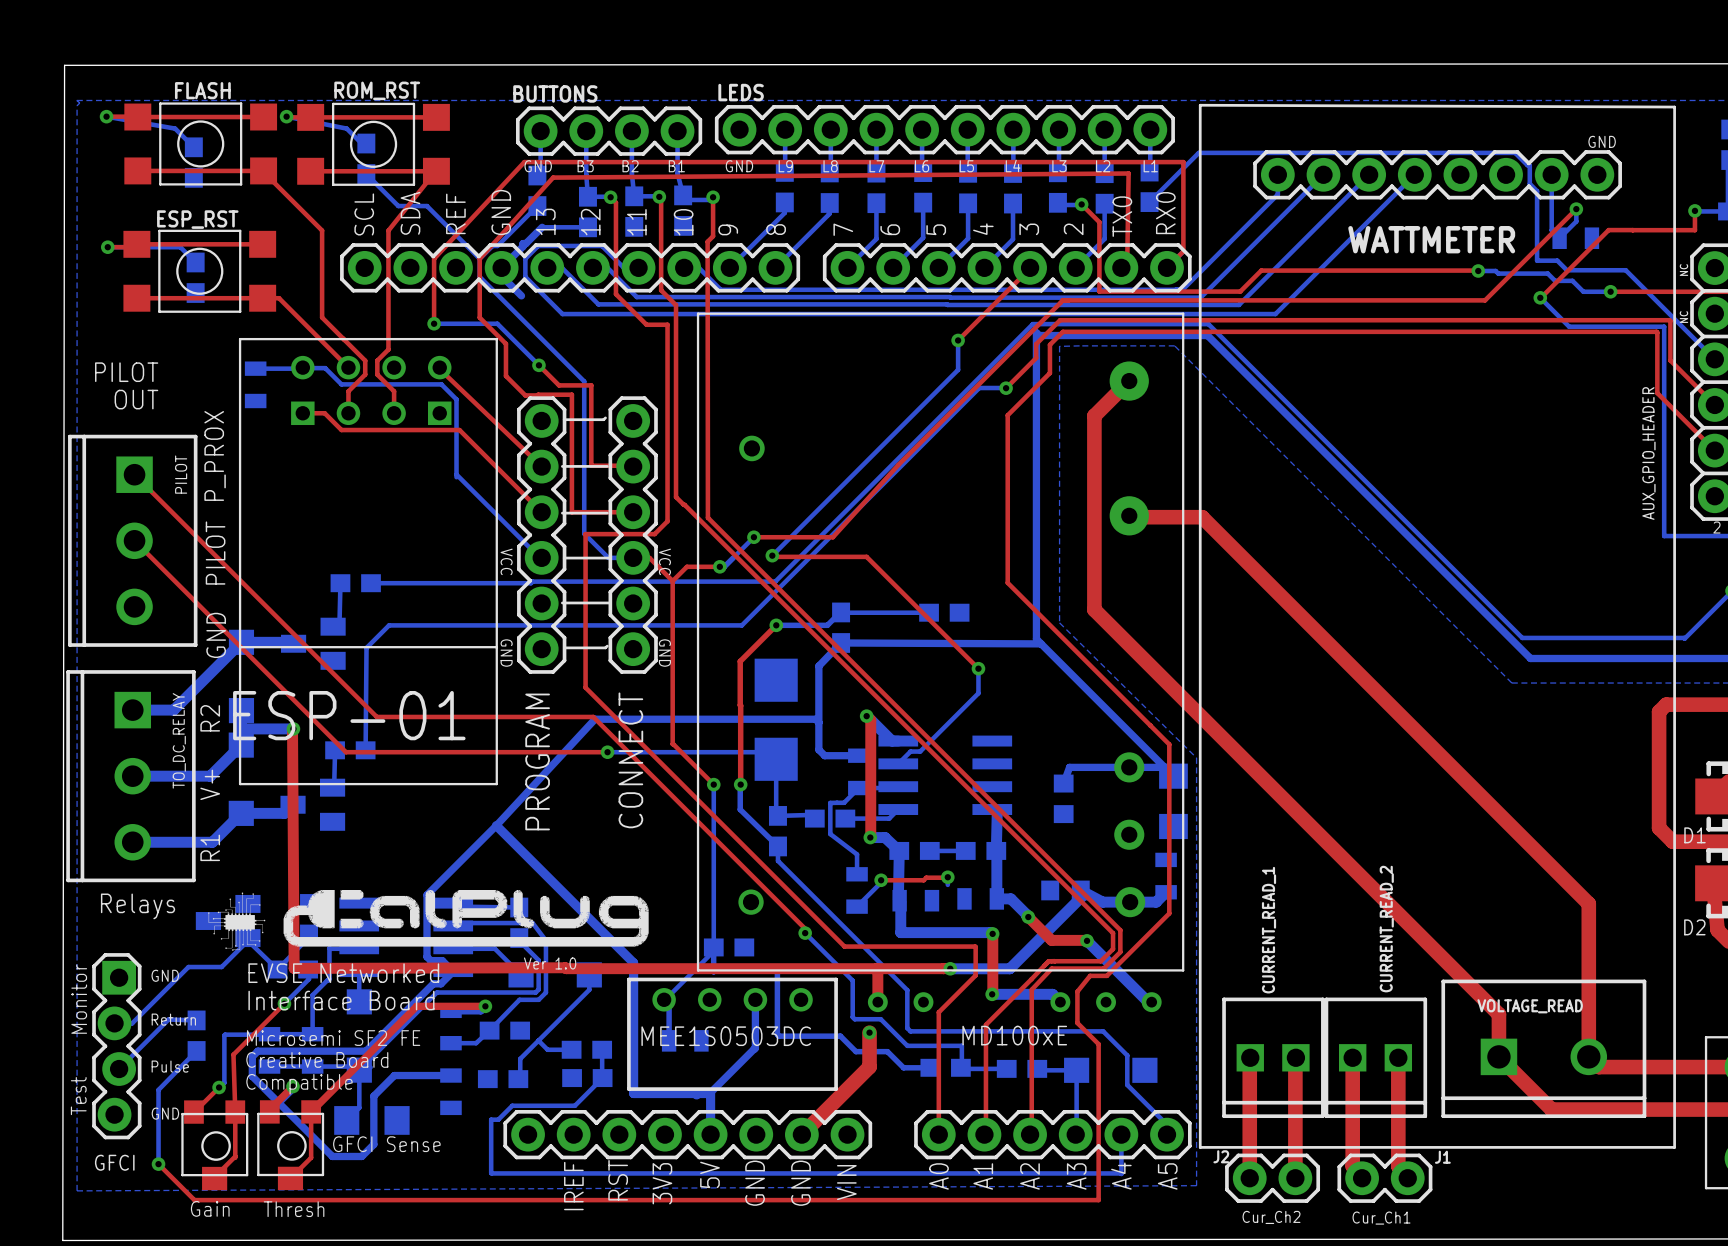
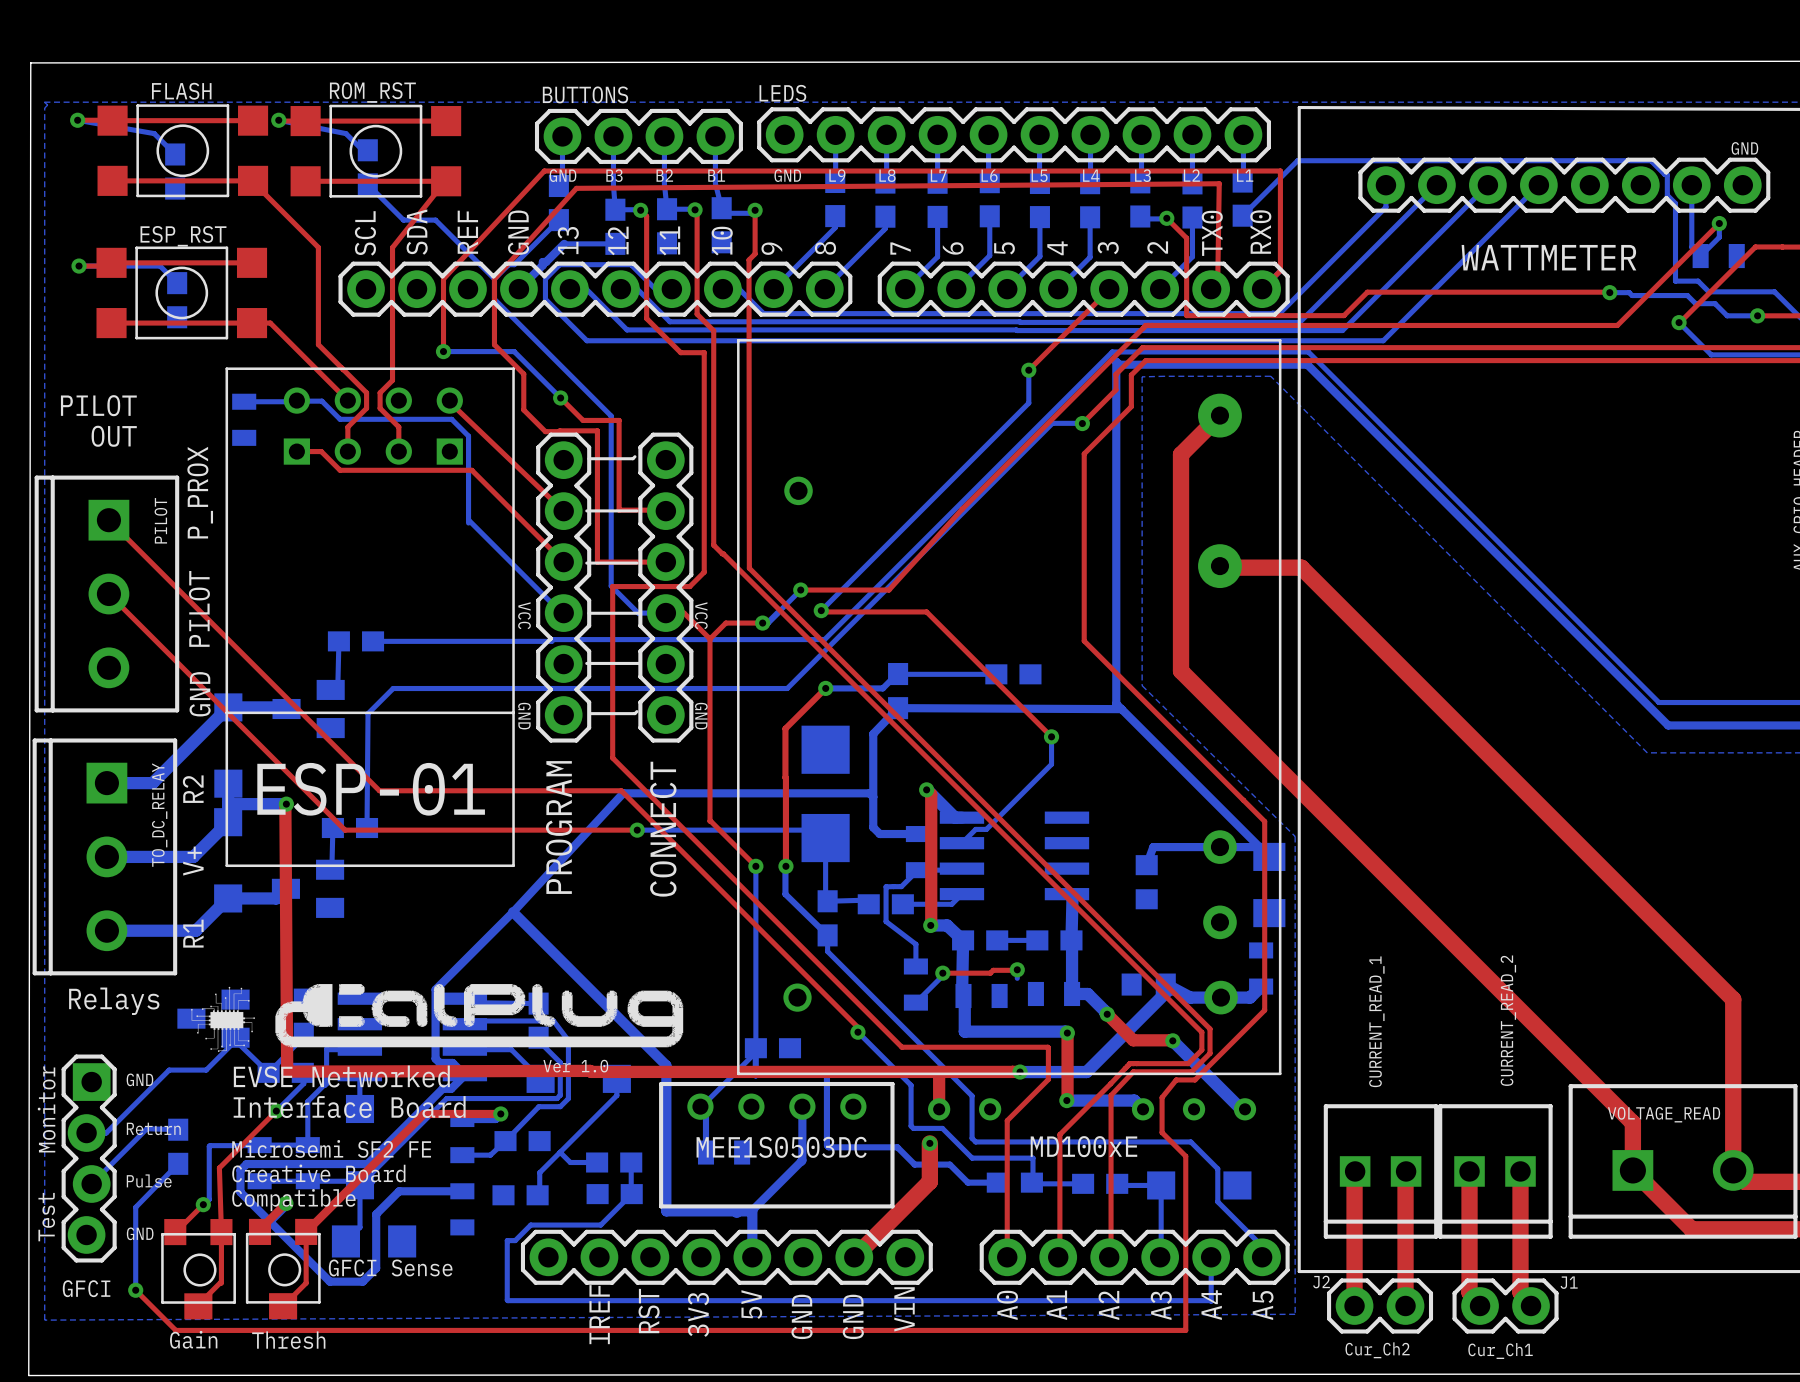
bottom track: (501, 267) (501, 276) (521, 295) -> none

